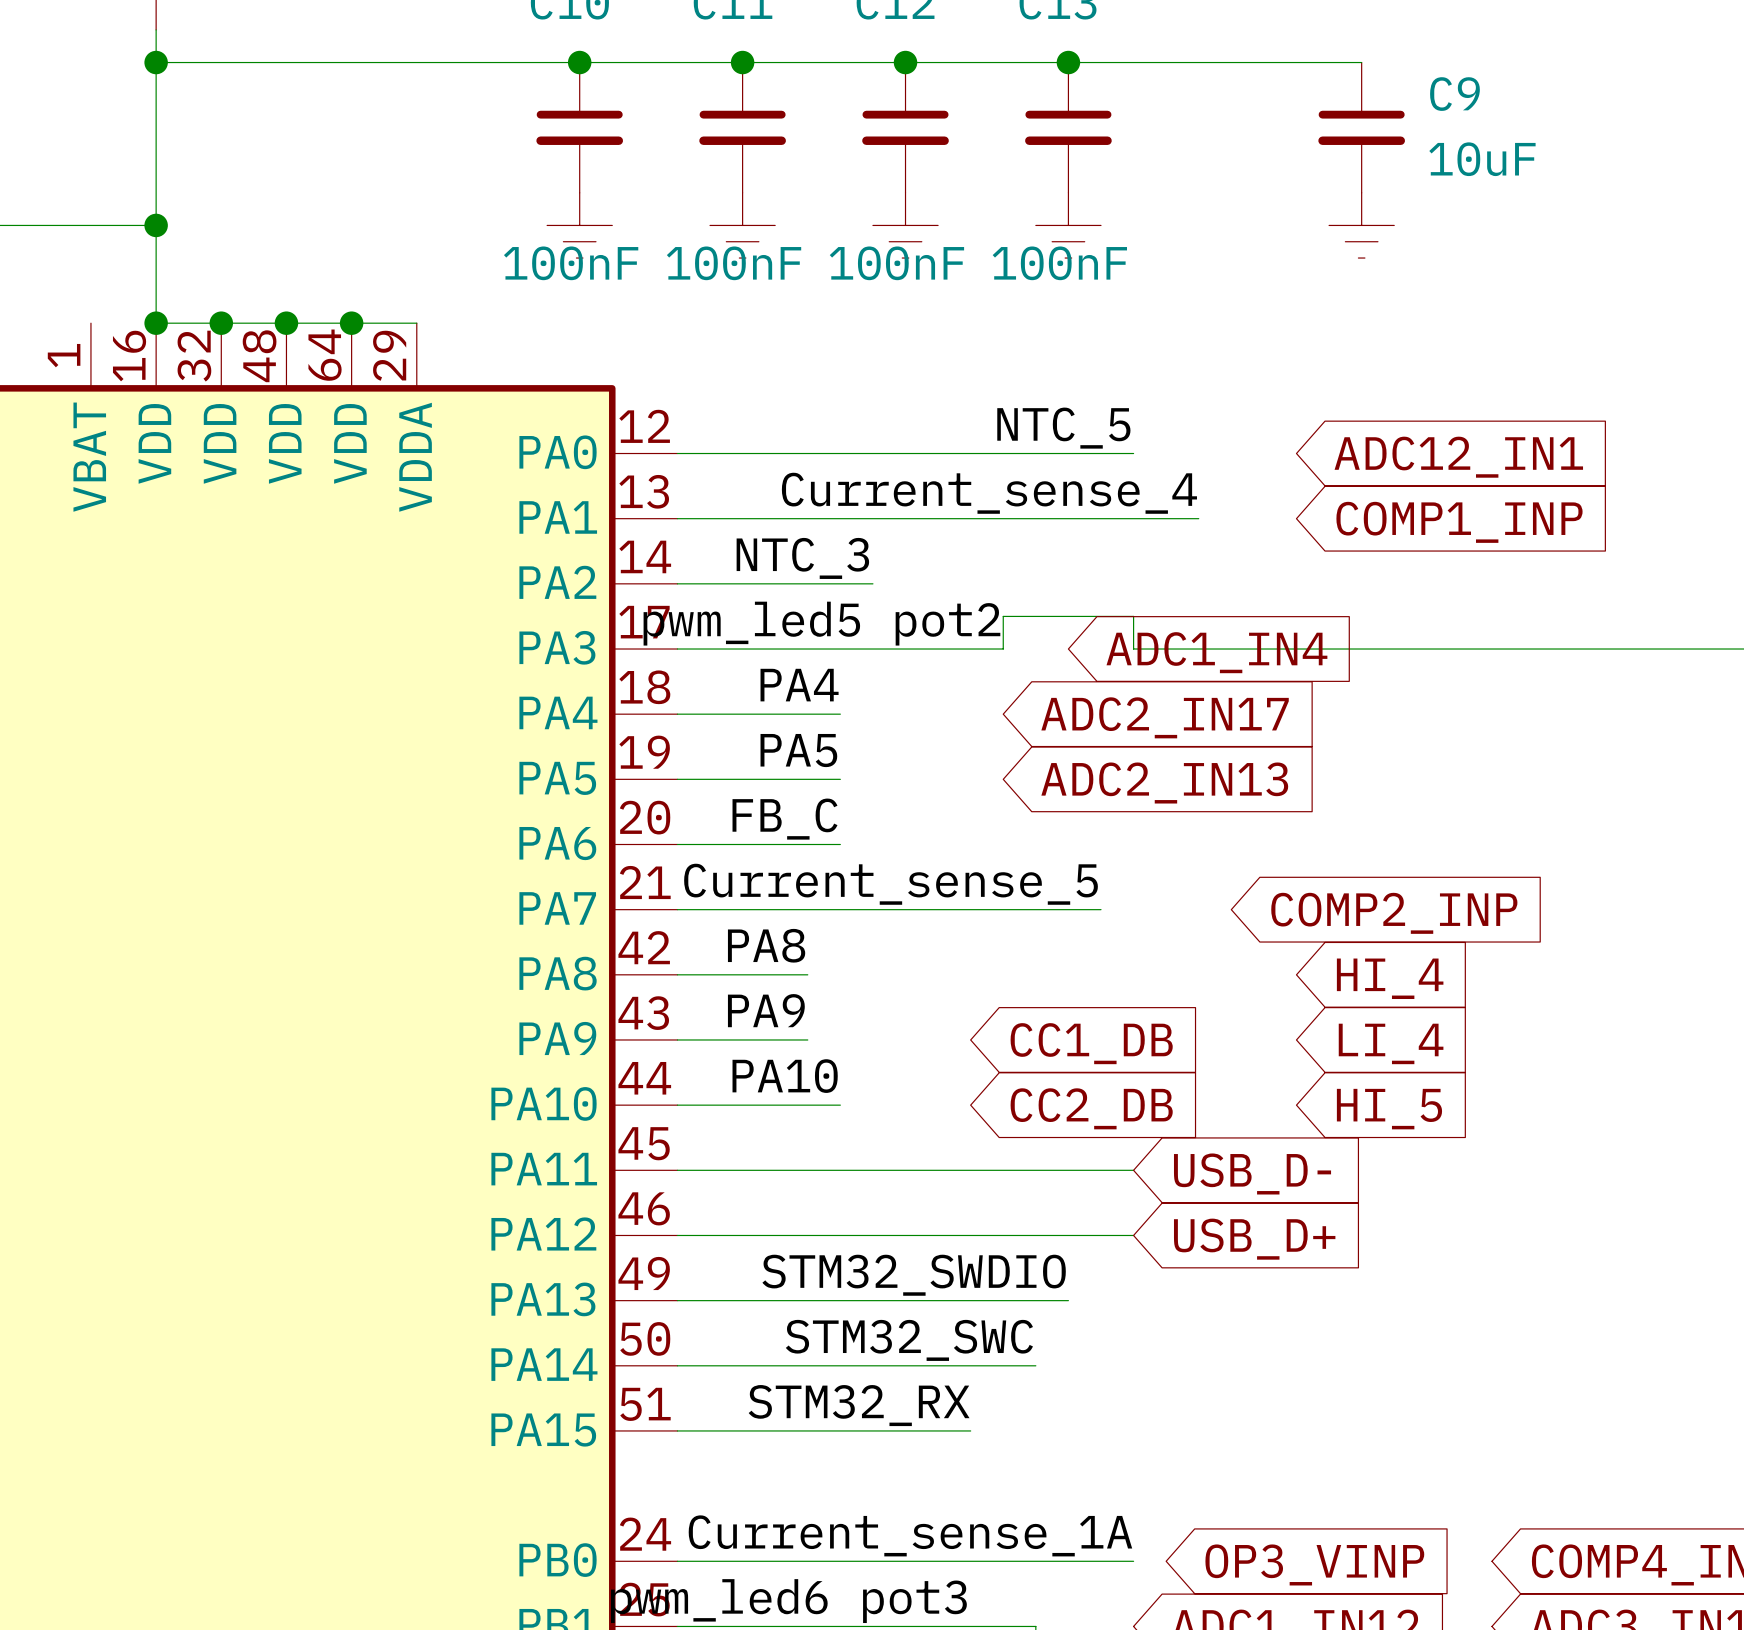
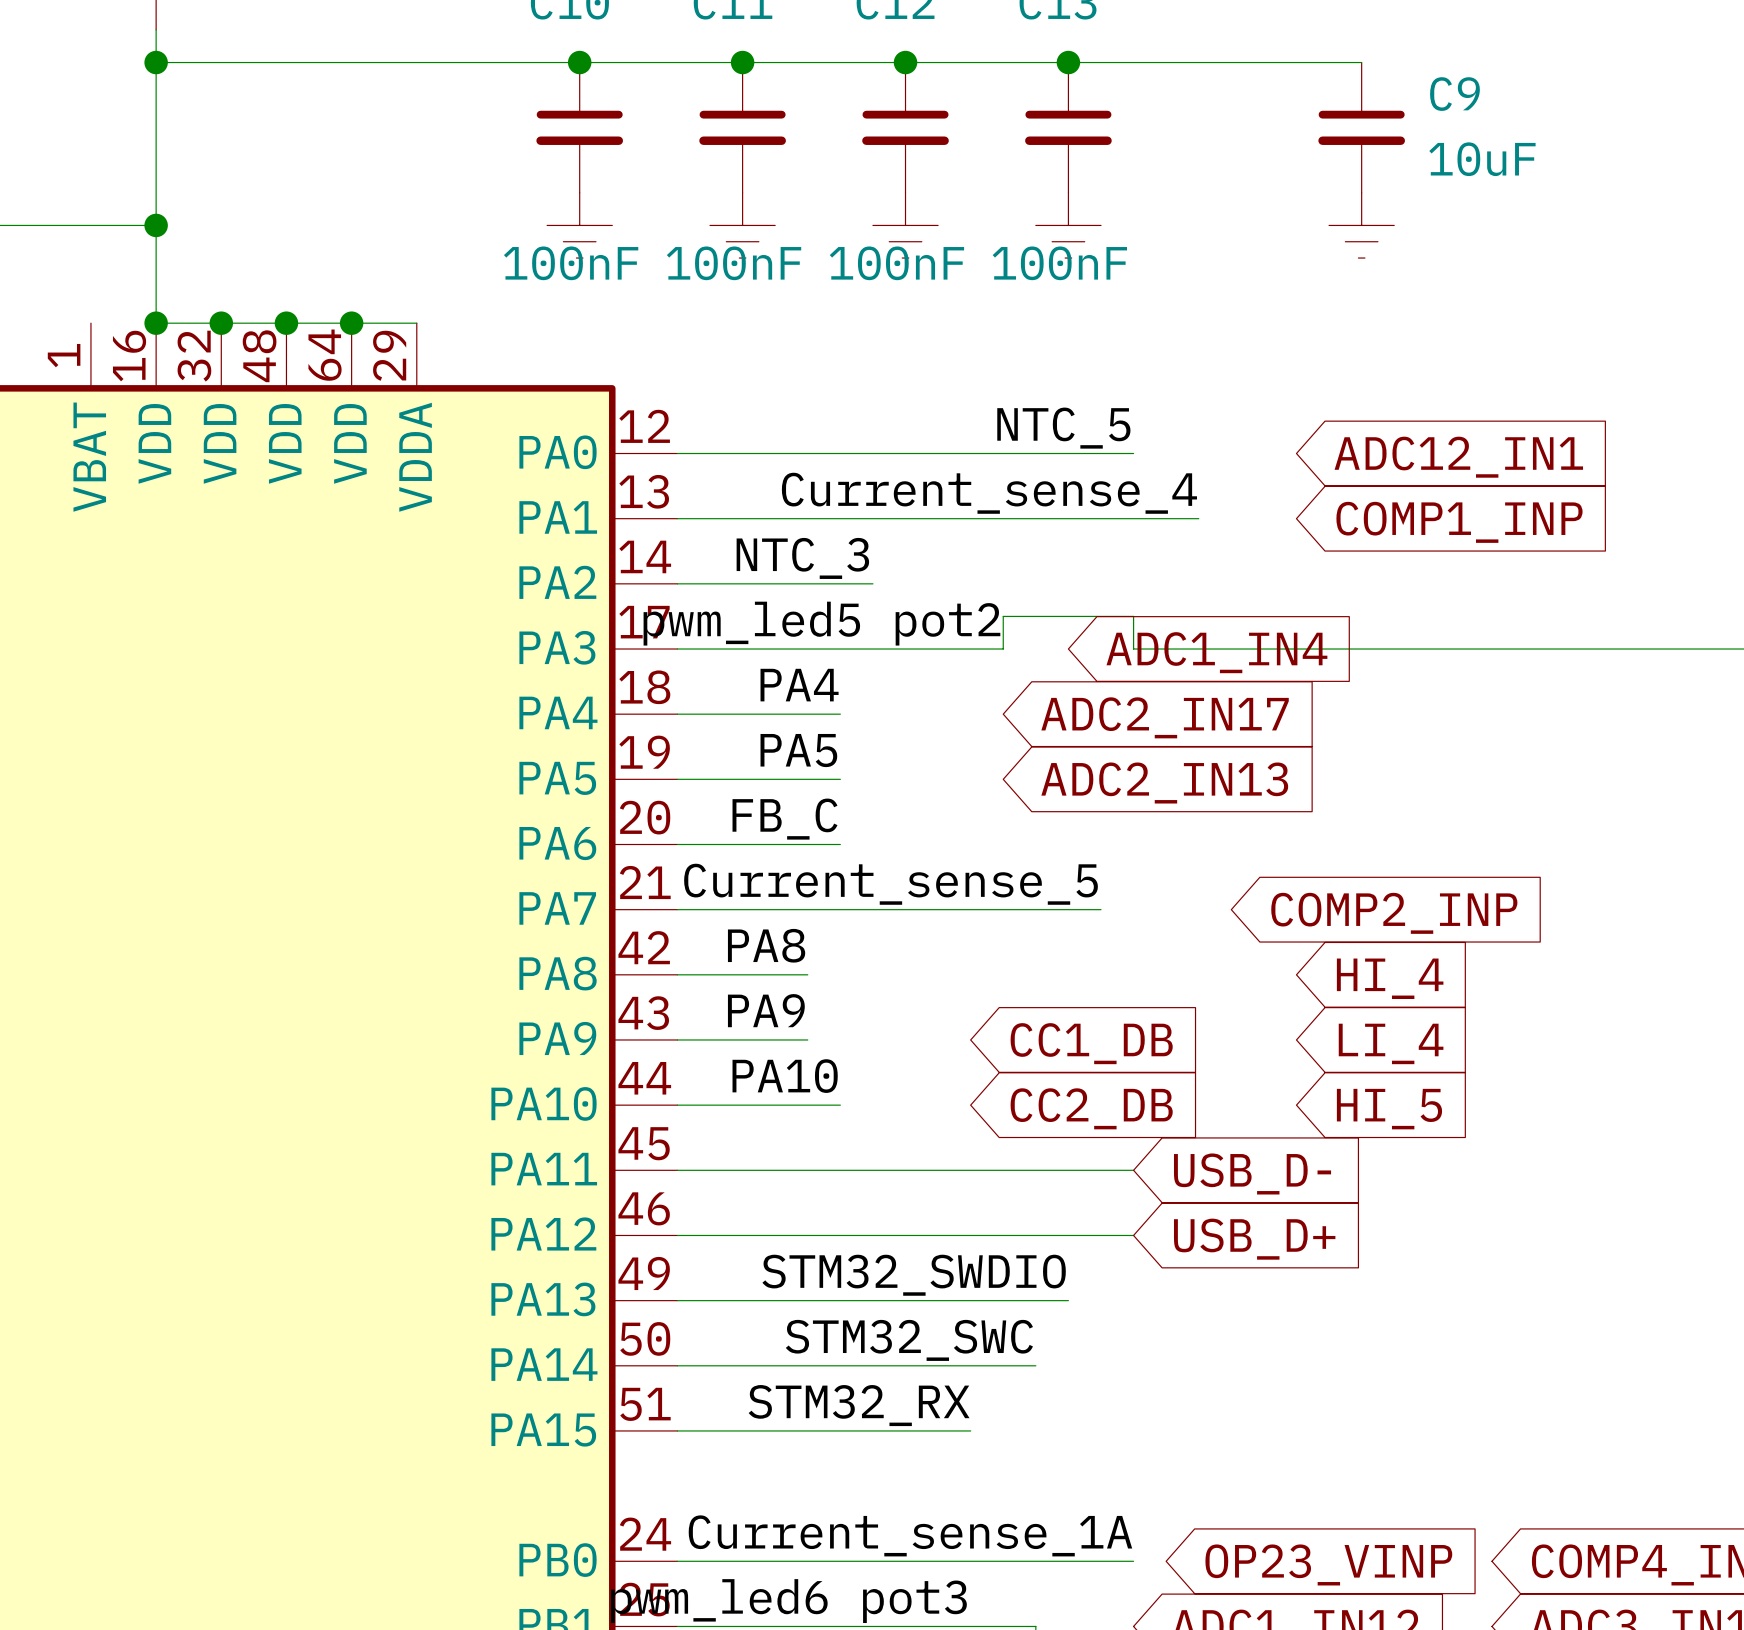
global label: OP3_VINP (1314, 1564) -> OP23_VINP (1328, 1564)

